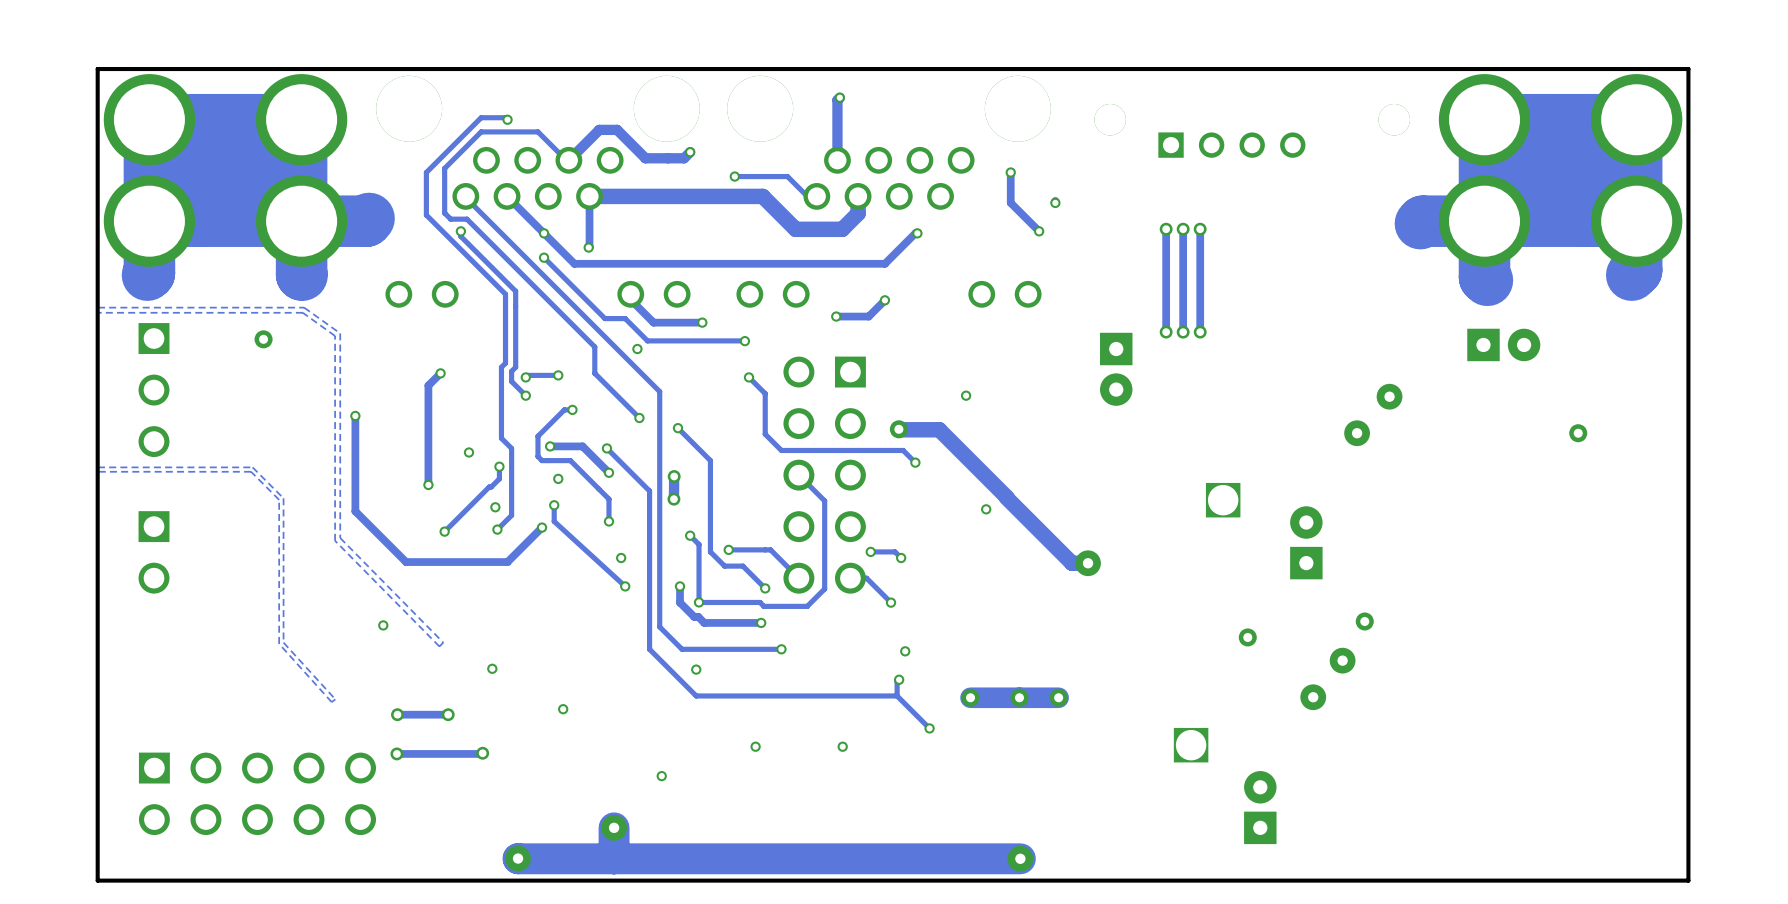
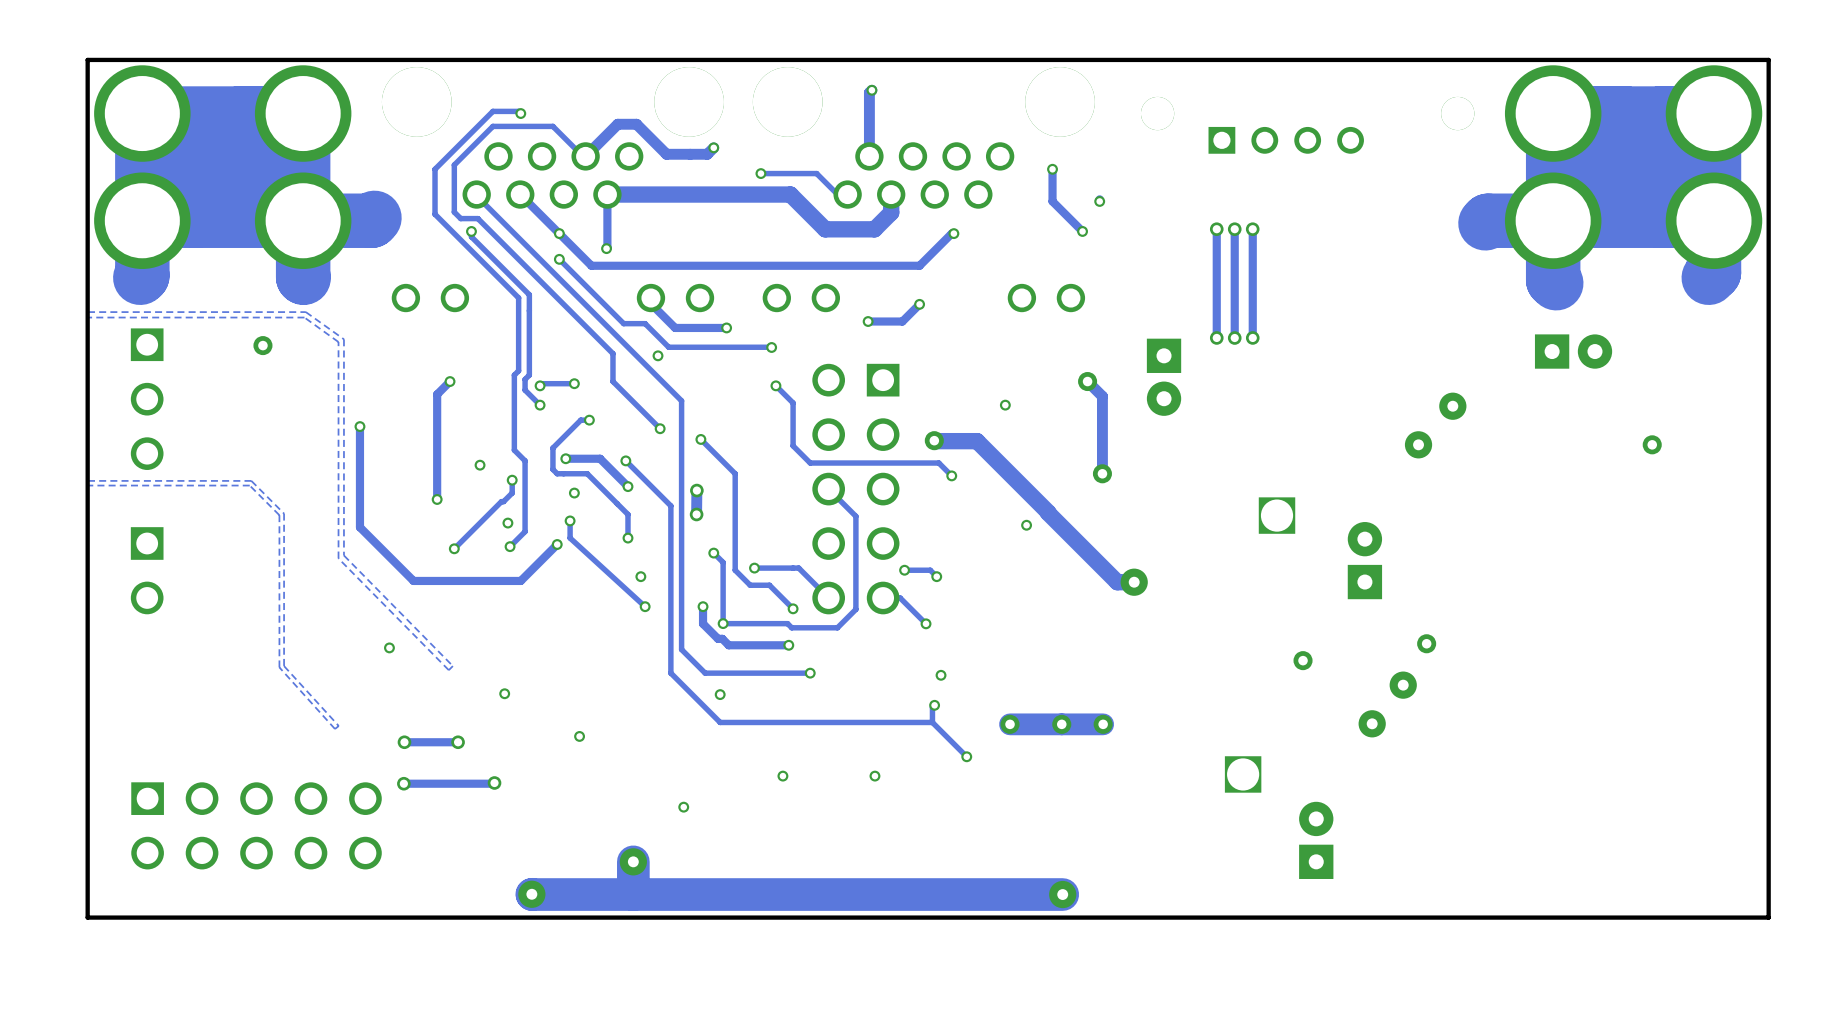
track: none -> (1087, 381) (1102, 396) (1102, 473)
via: none -> (1087, 381)
via: none -> (1102, 473)

